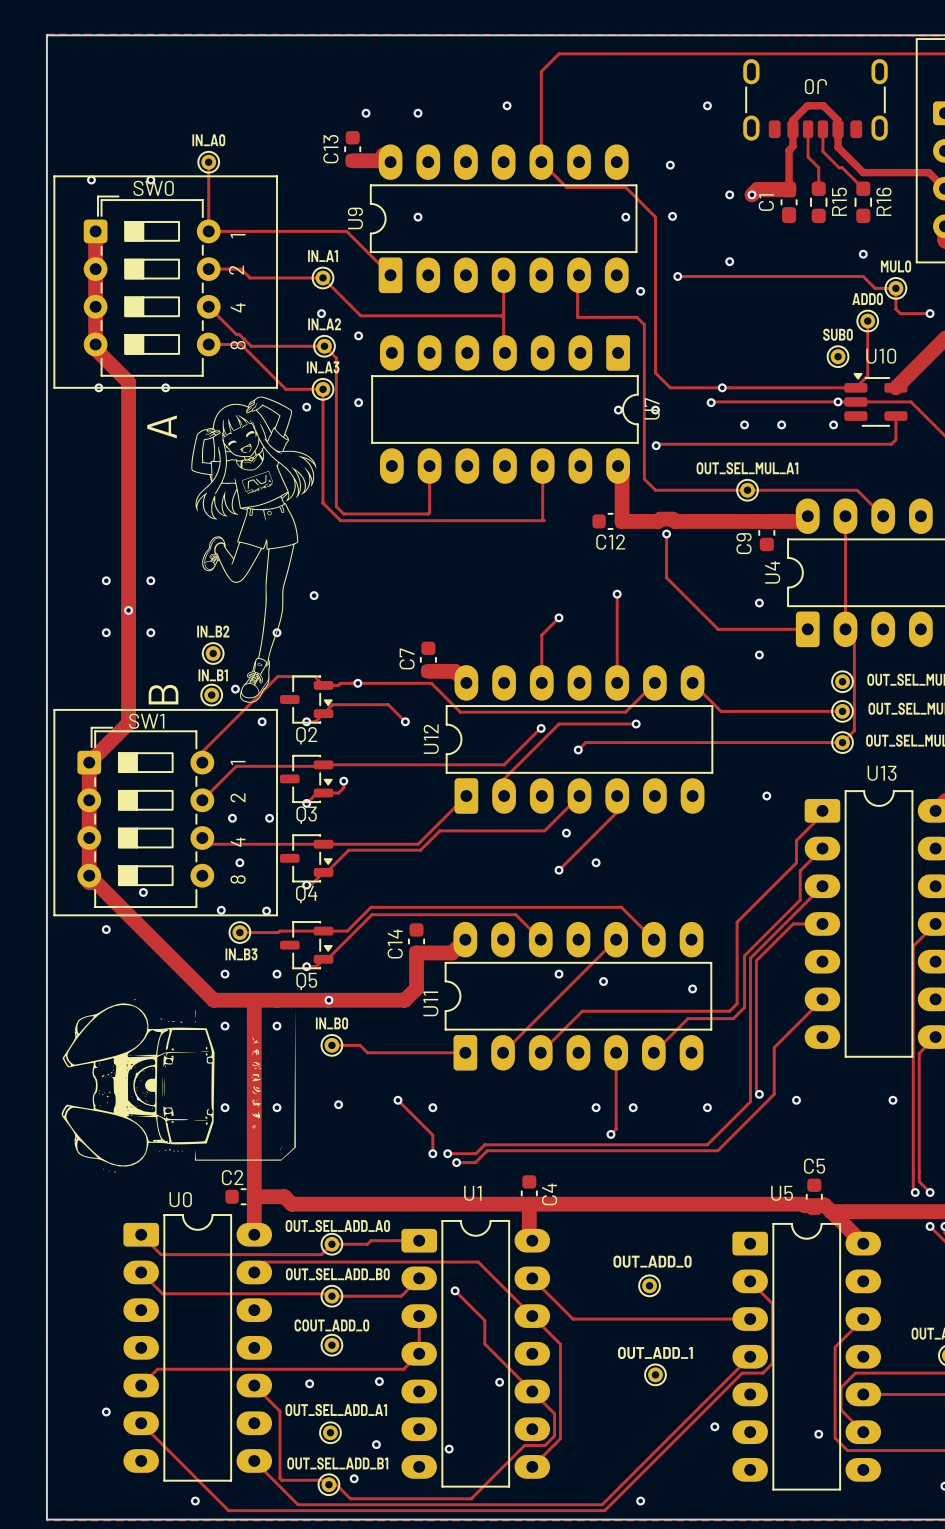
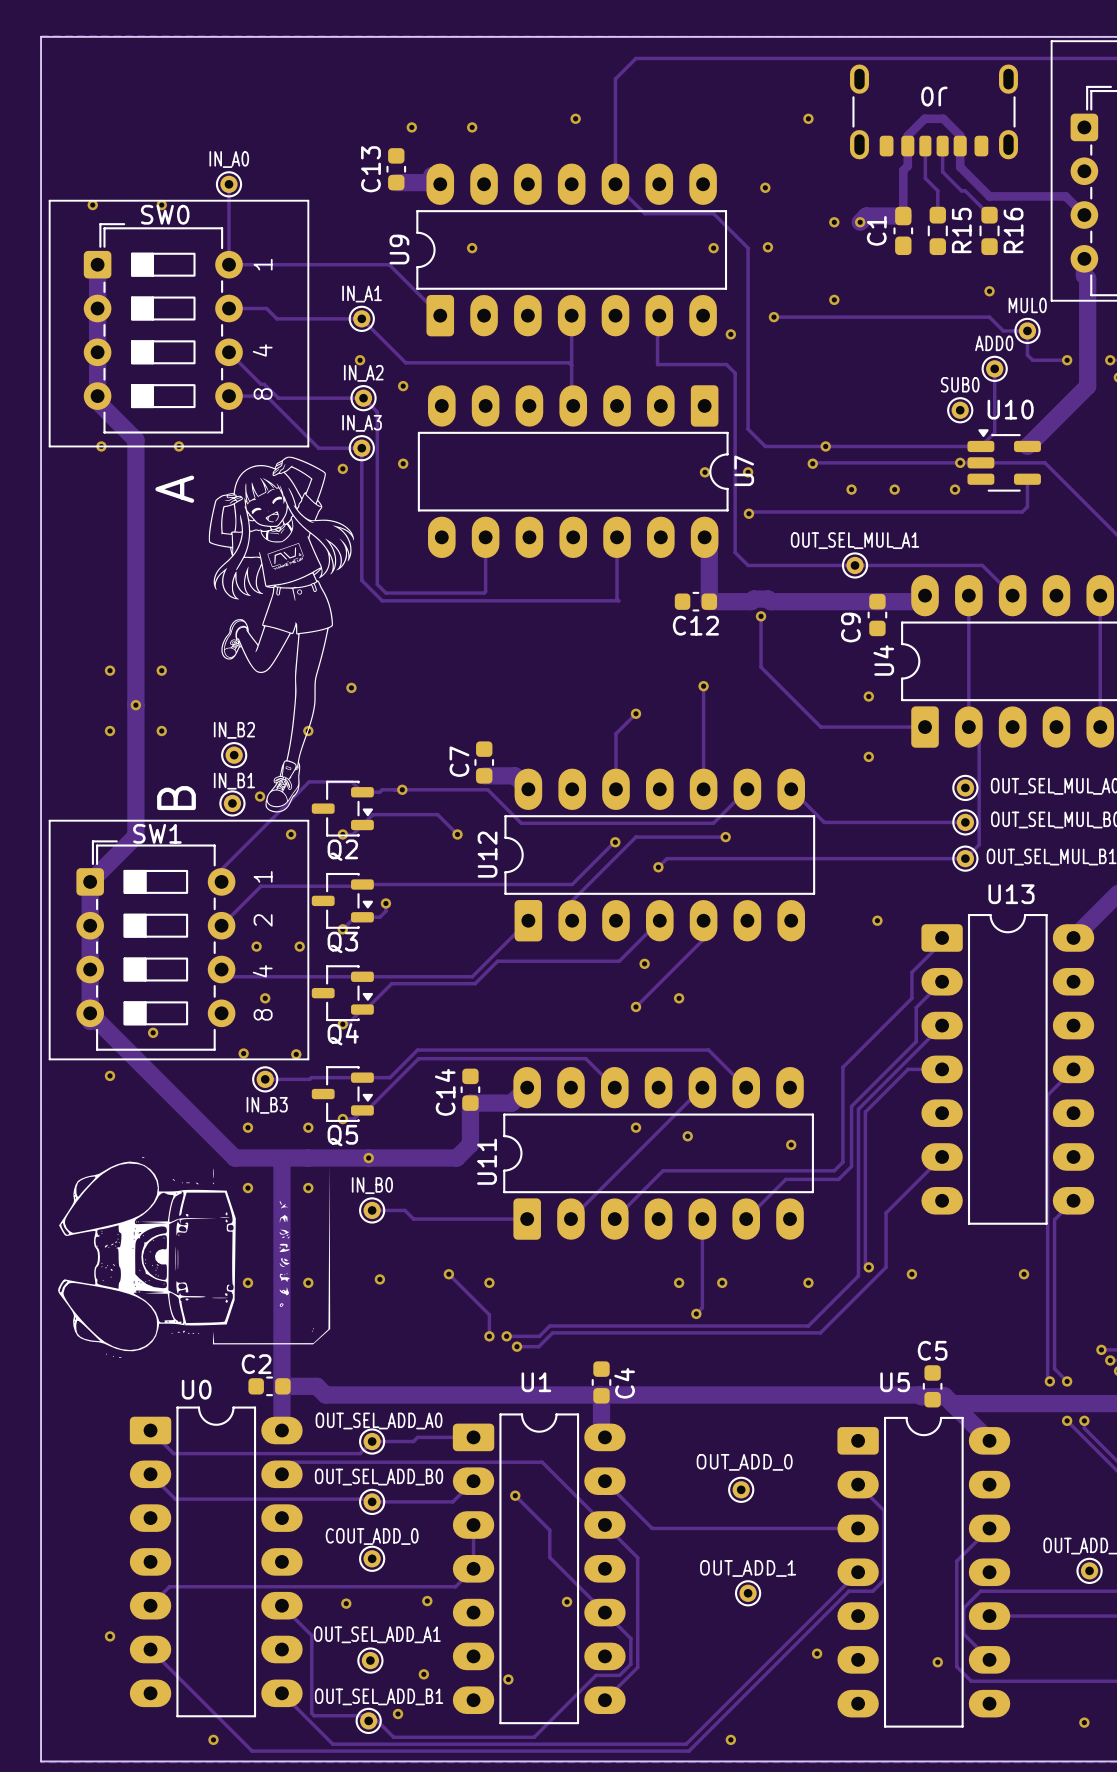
text: 2 (236, 270) -> none

